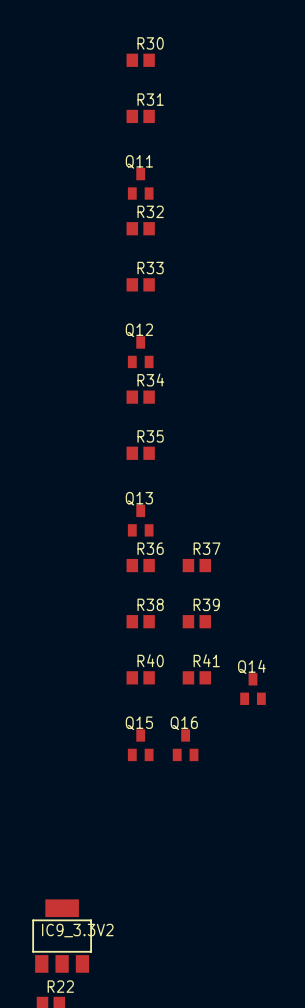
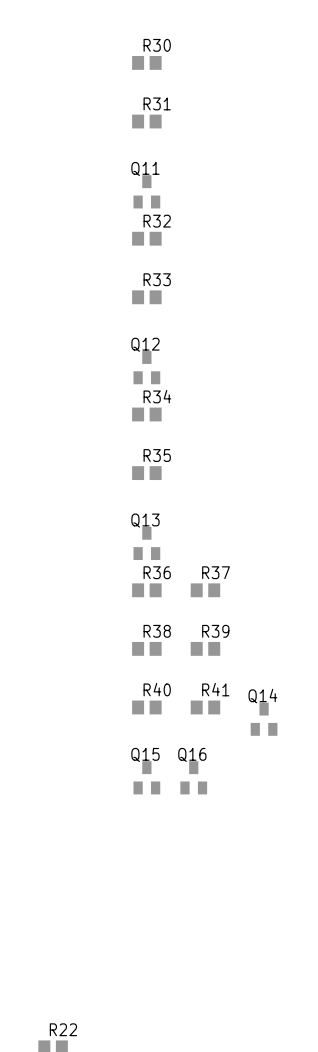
IC9_3.3V2: (62, 936) -> none

